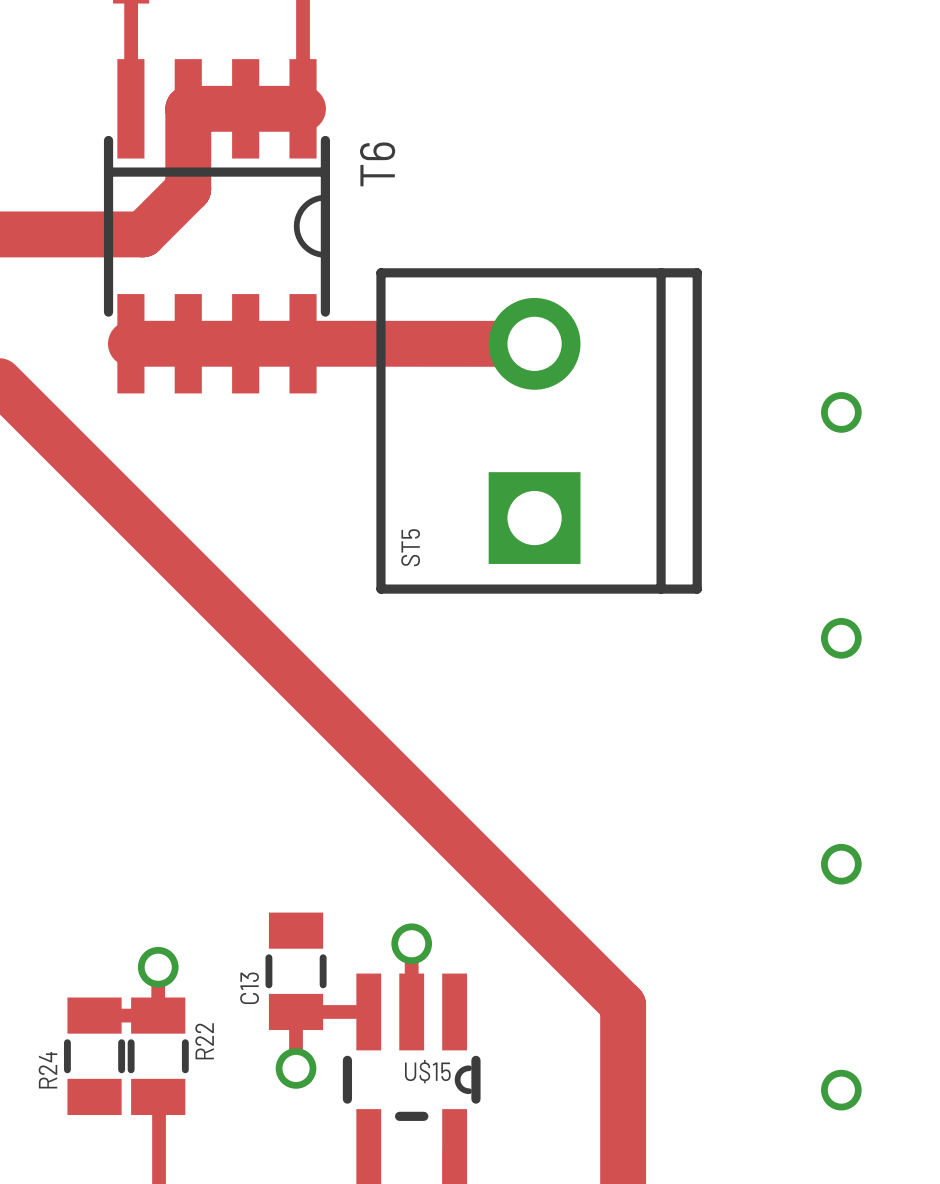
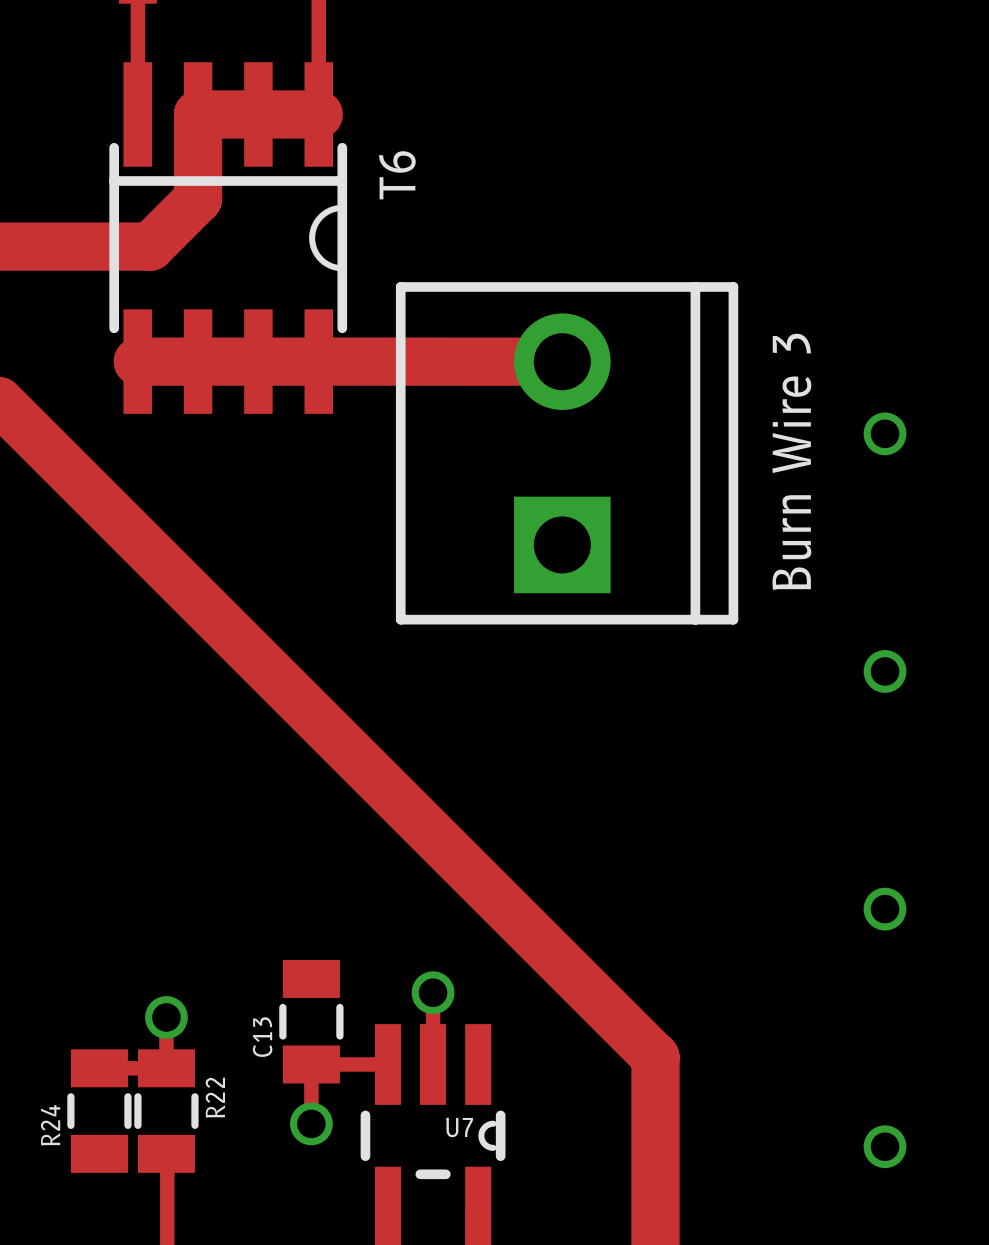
text: none -> Burn Wire 3 (791, 461)
ST5 name: ST5 (410, 547) -> none
U$15 name: U$15 (427, 1071) -> U7 (459, 1127)

